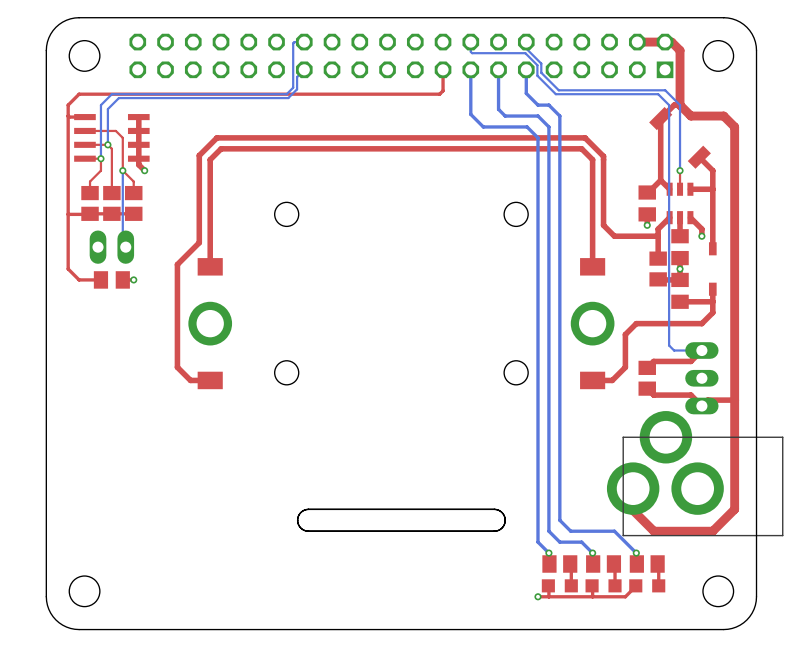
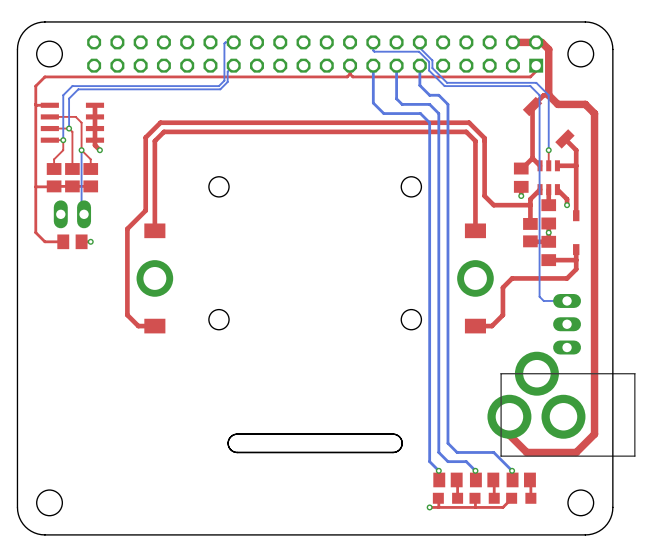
top track: (443, 79) (443, 90) (439, 94) (79, 94) (68, 105) -> (536, 65) (536, 71) (530, 76) (352, 76) (350, 74) (347, 76) (44, 76) (35, 86) (35, 95)
top track: (701, 350) (690, 361) (653, 361) (647, 367) -> none
part: (647, 378) -> none
top track: (647, 388) (653, 395) (690, 395) (701, 406) (707, 400) (734, 400) -> none

